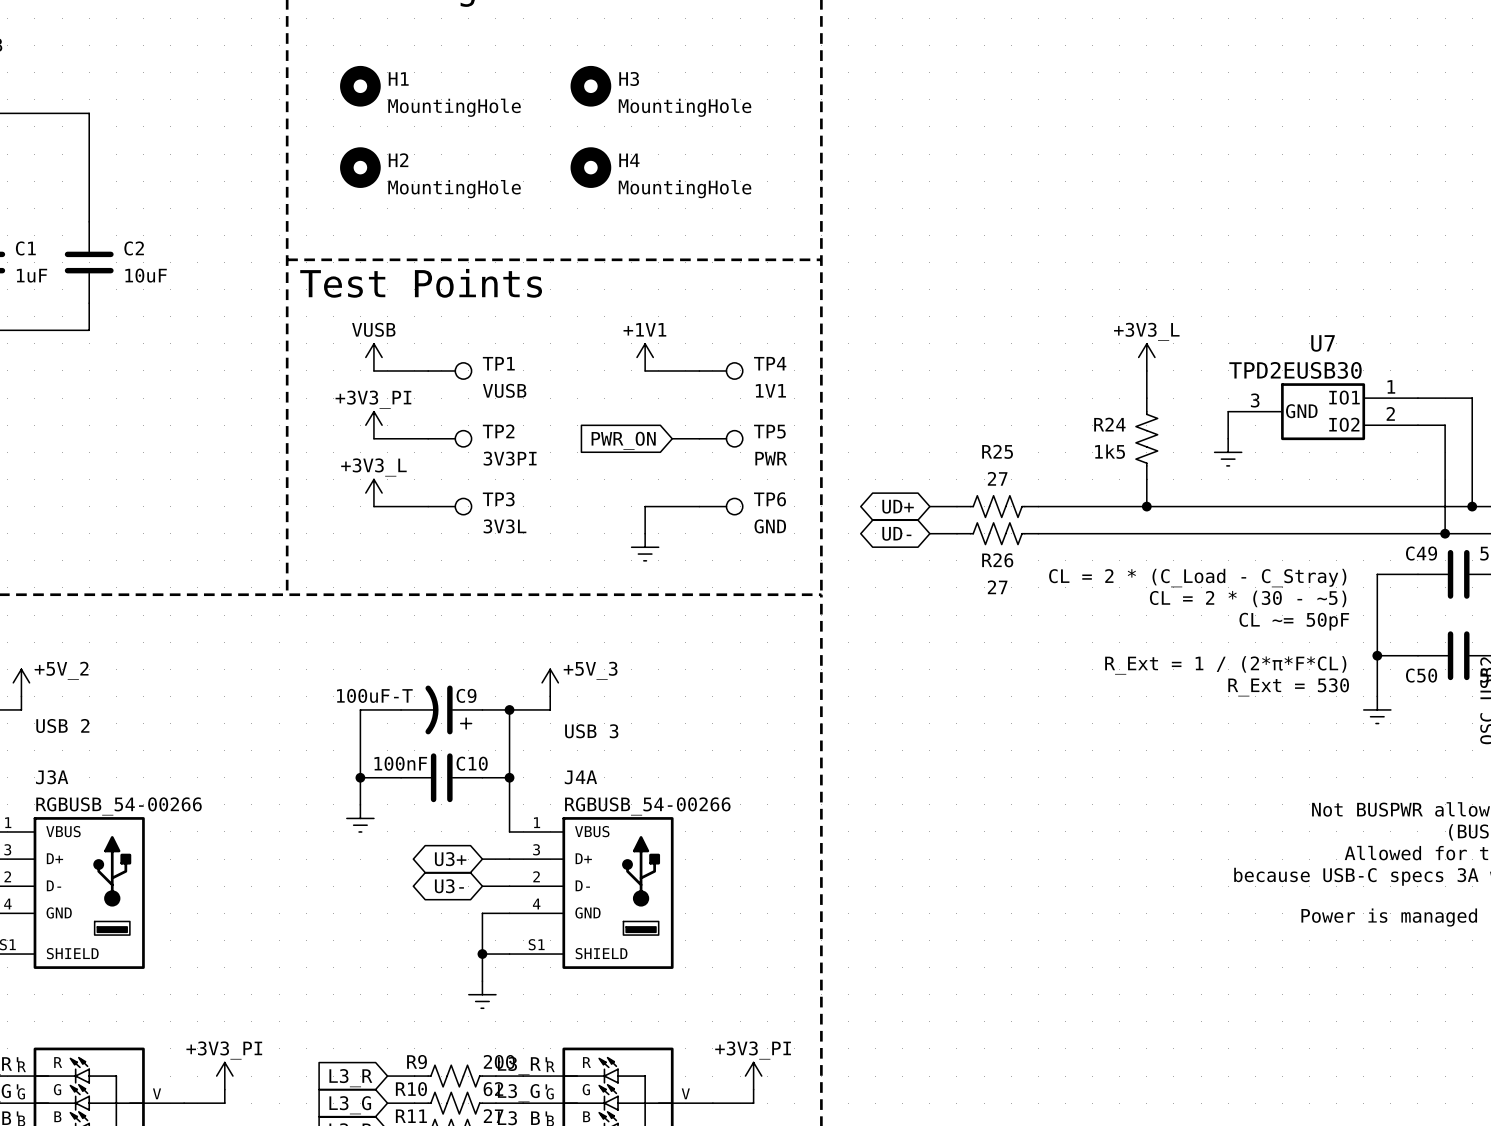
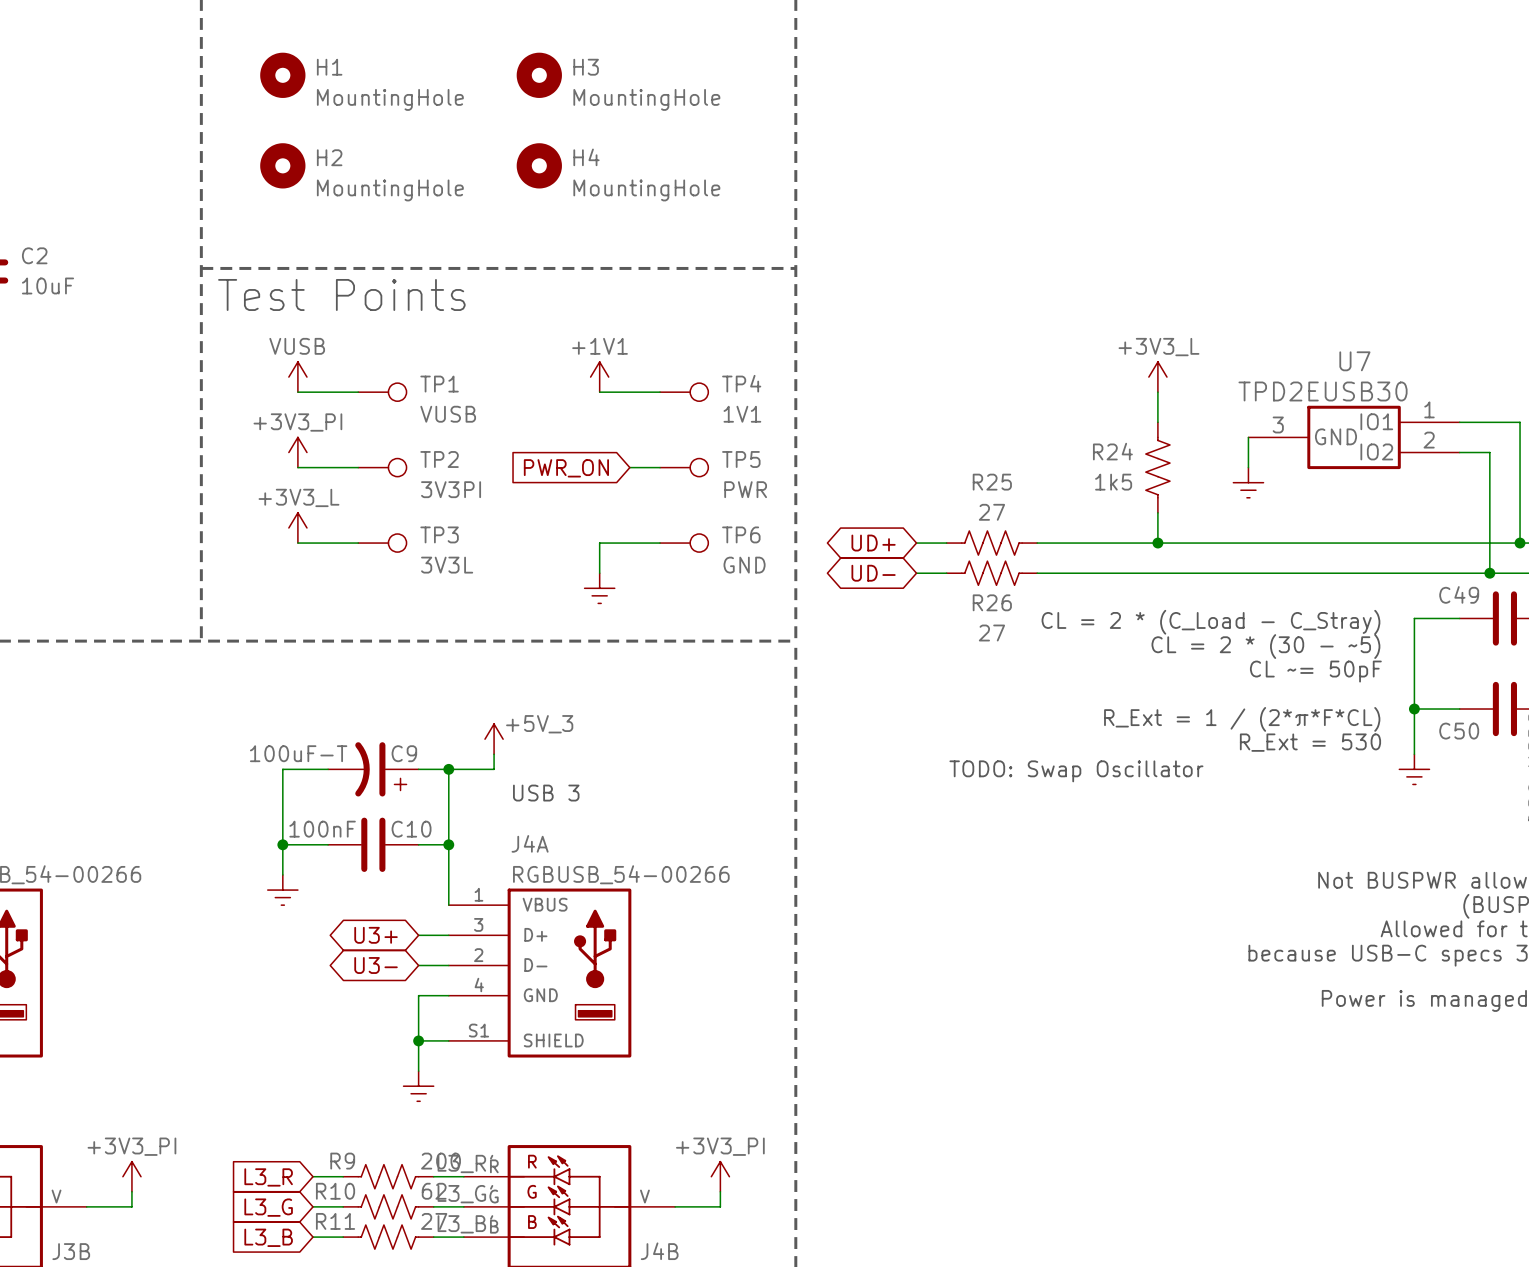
text: none -> TODO: Swap Oscillator (1076, 771)

